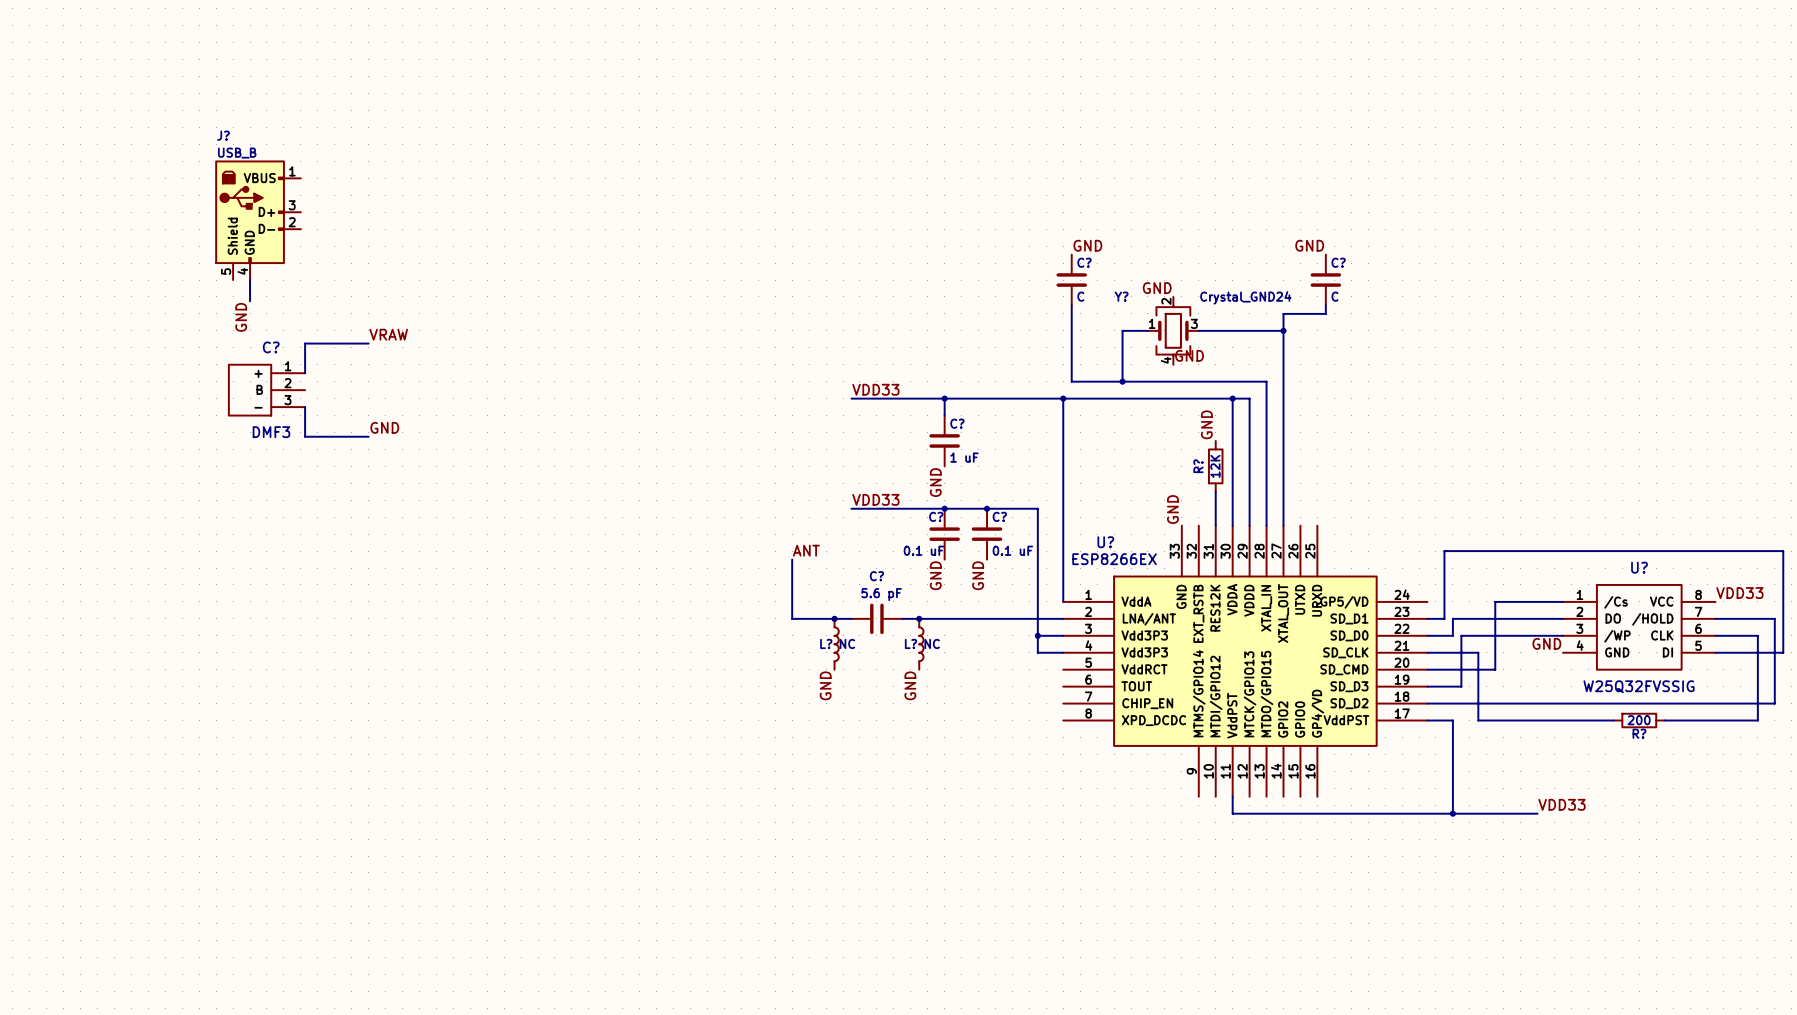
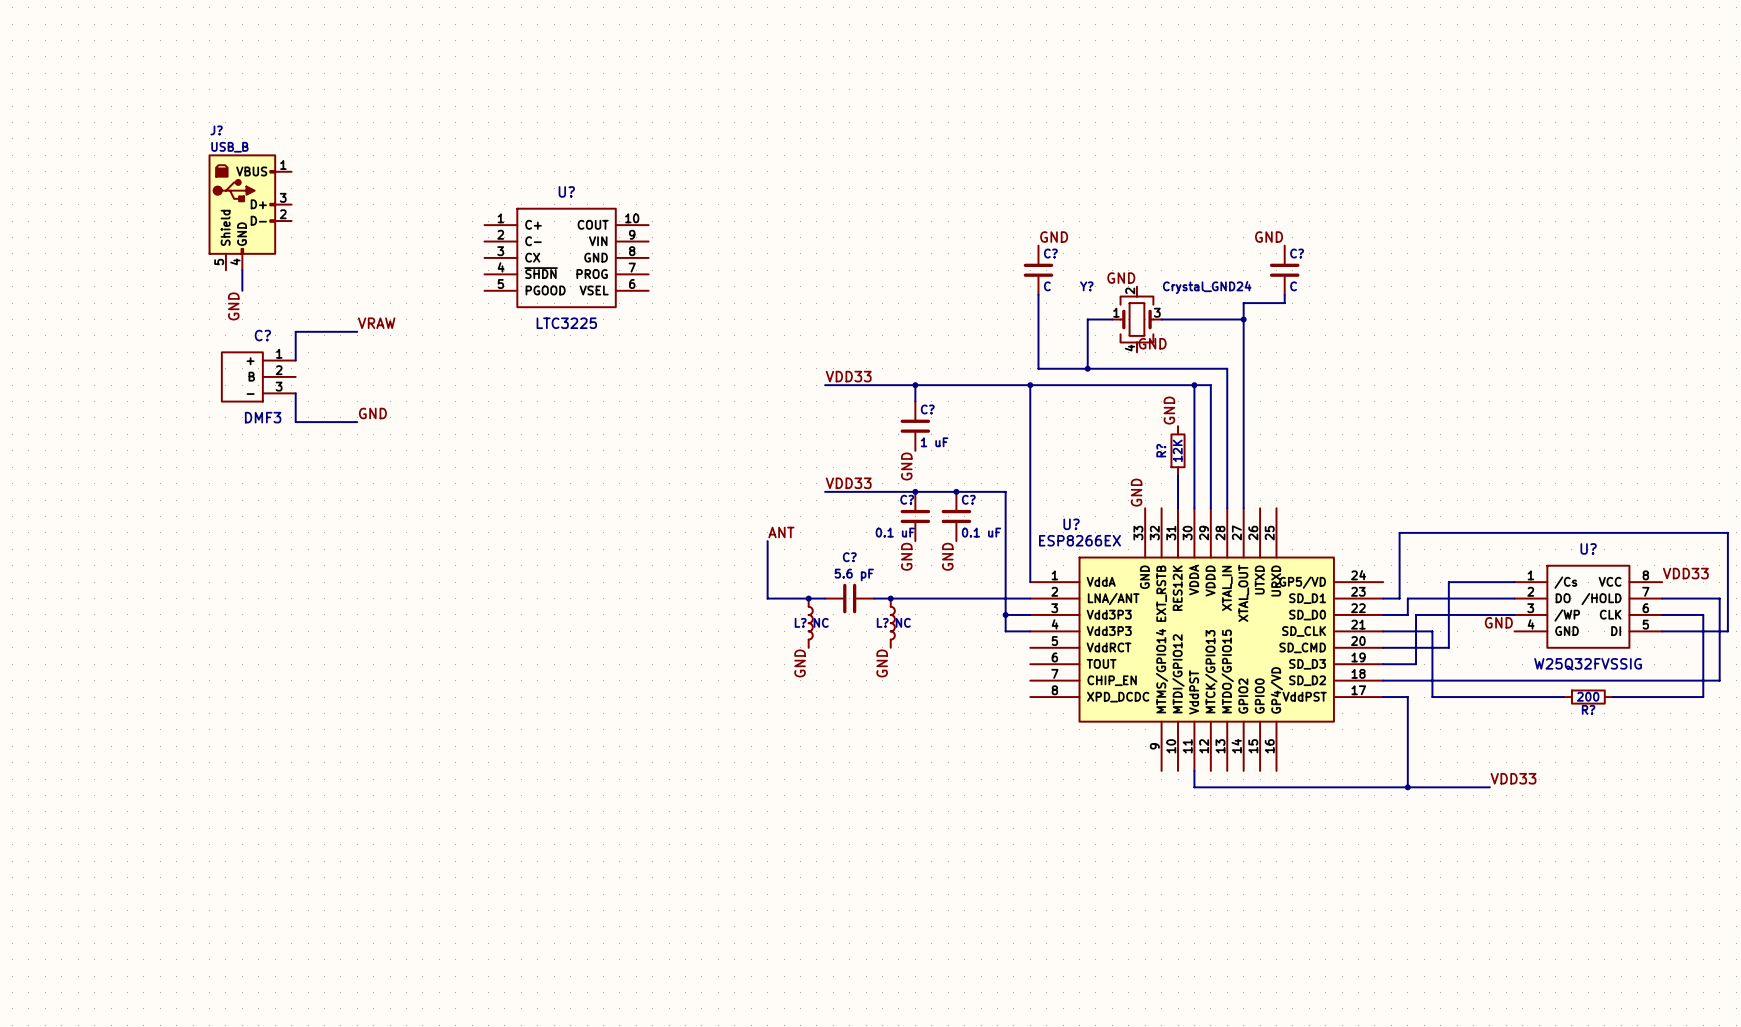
U?: none -> LTC3225 (566, 257)

